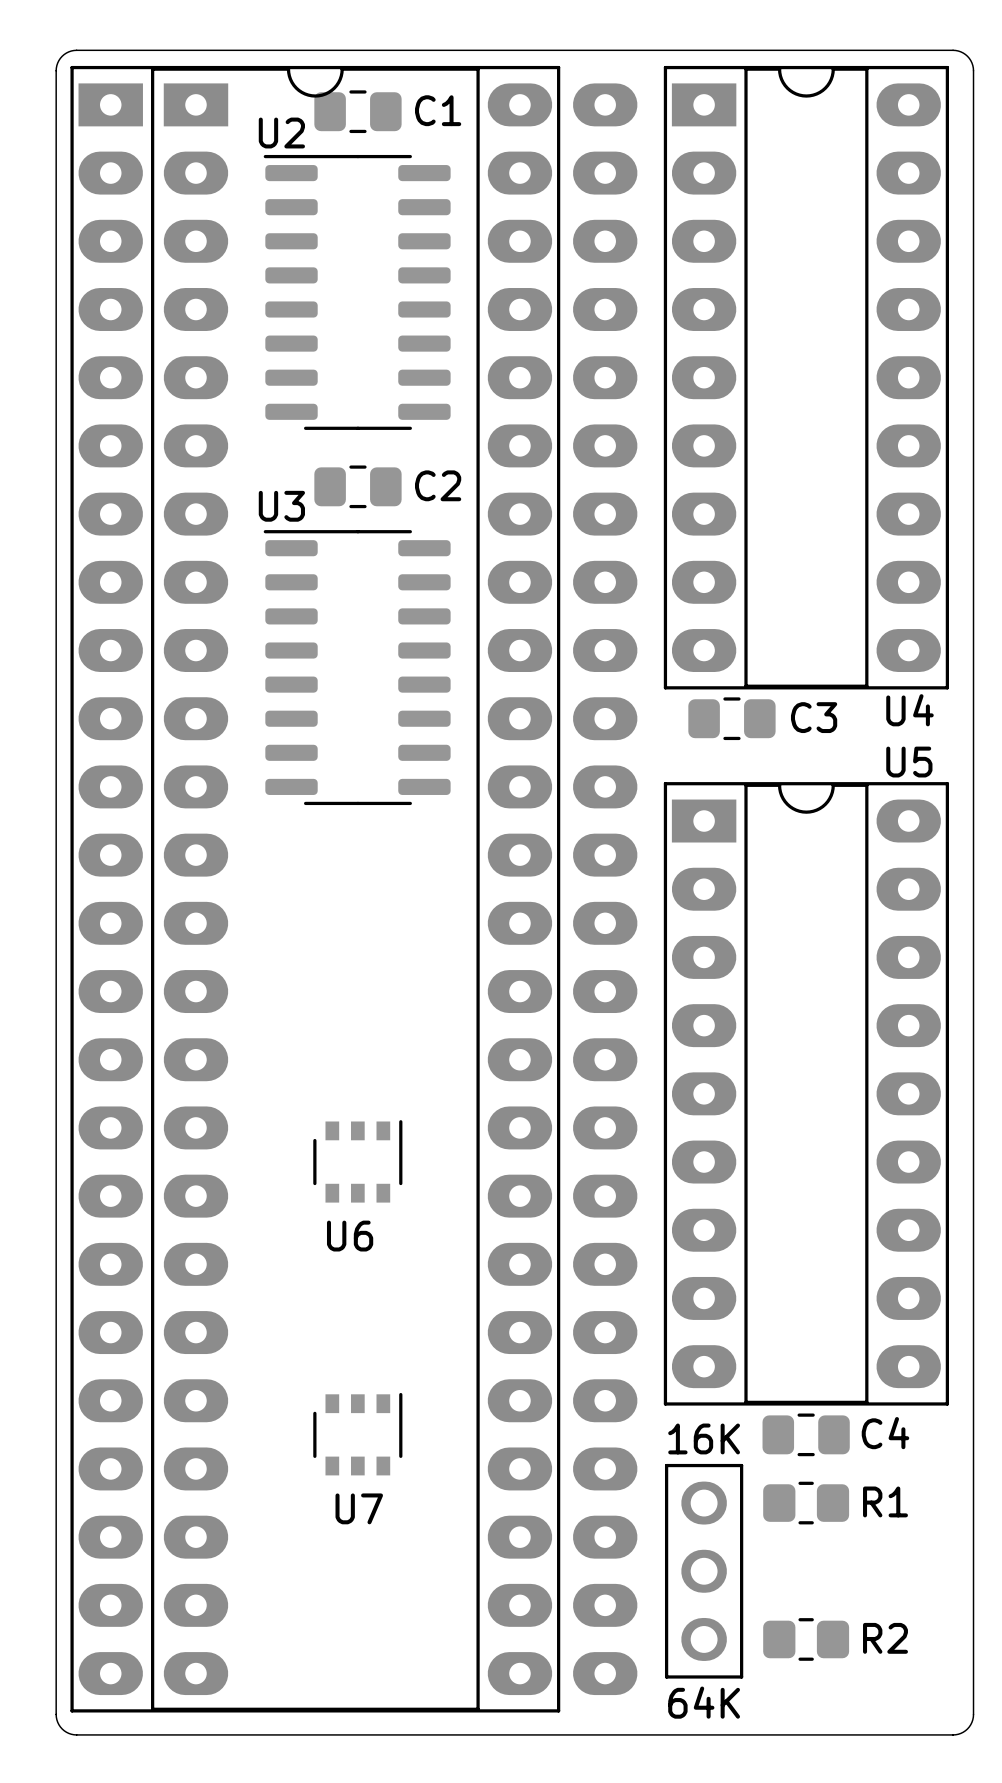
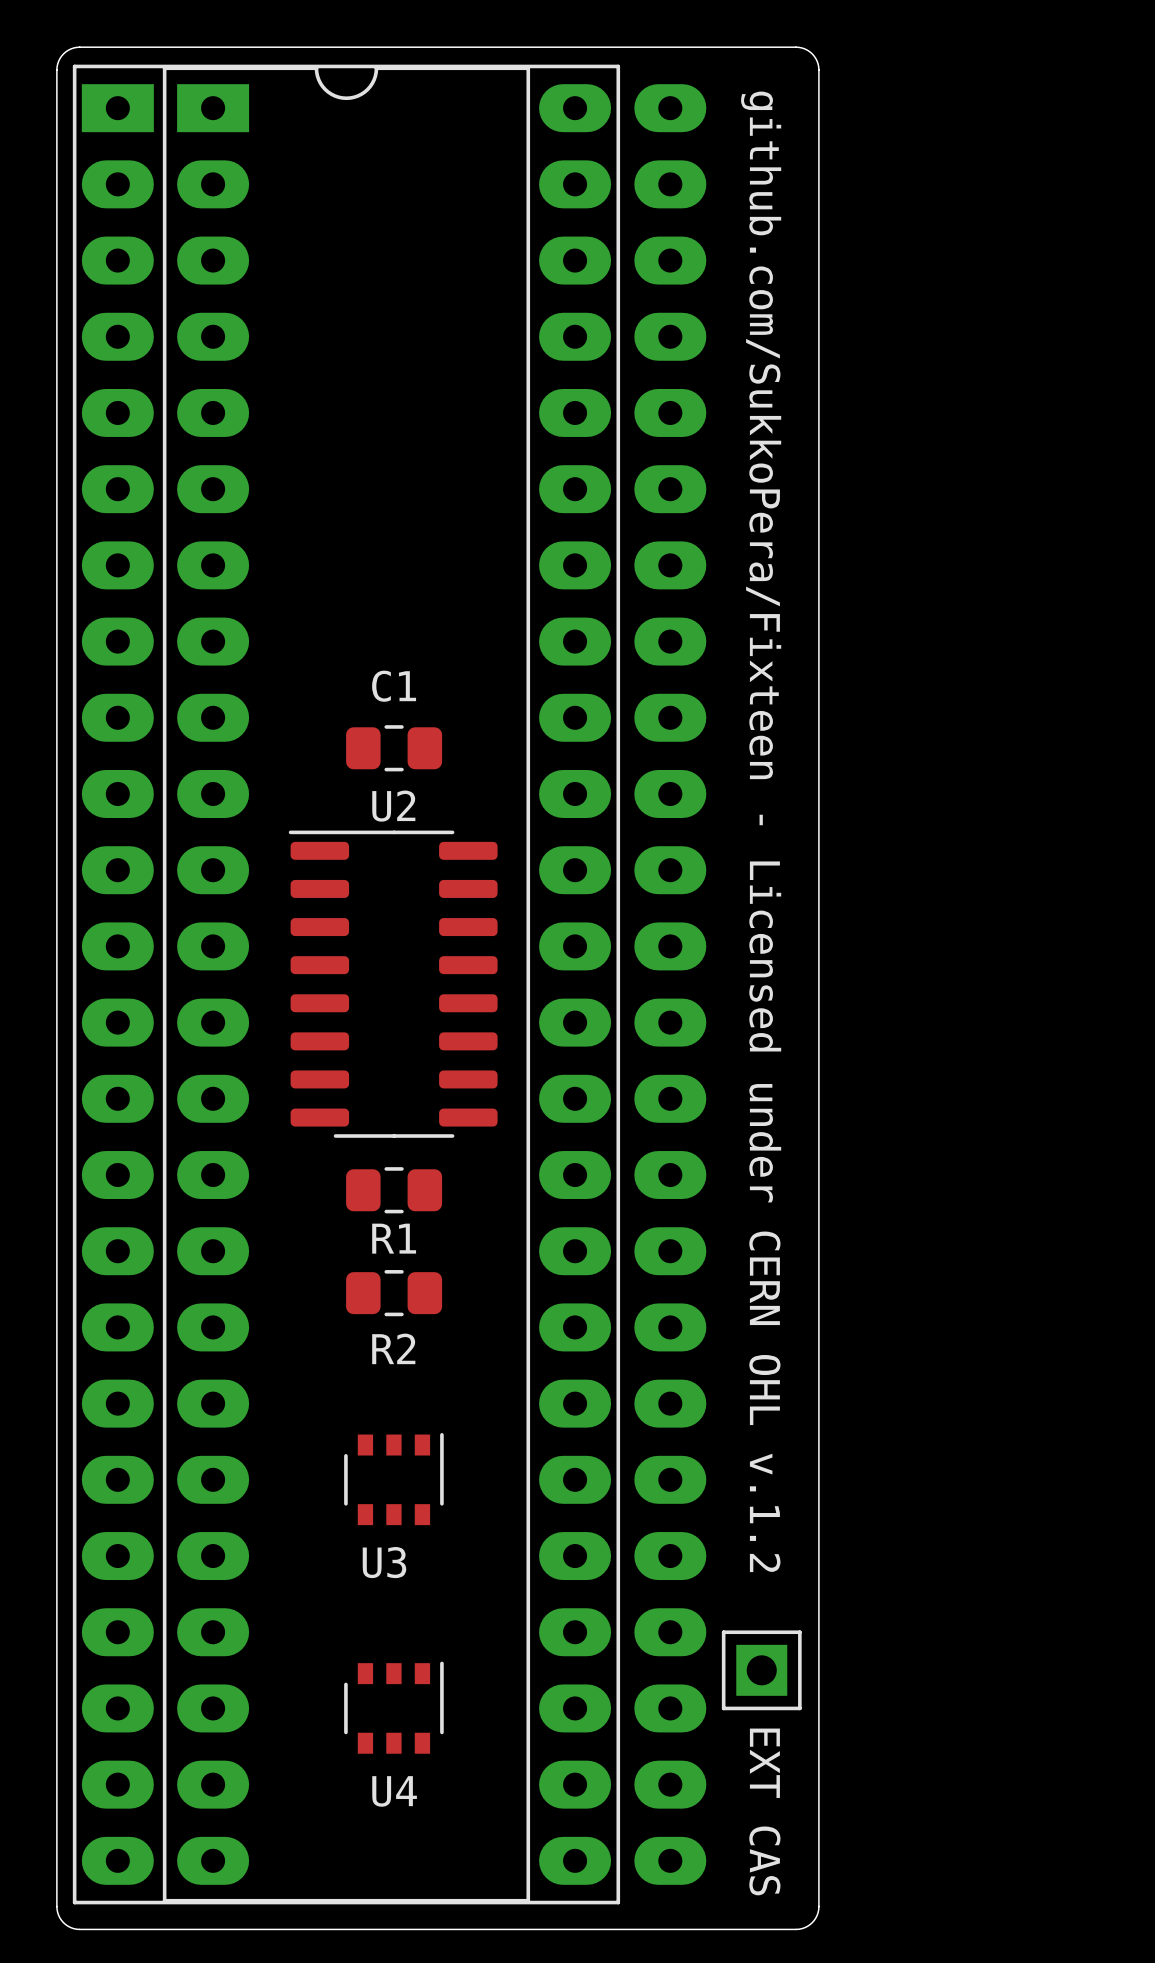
board edge: (717, 50) (955, 50) (967, 56) (971, 62) (973, 70) (973, 1717) (967, 1728) (955, 1734) (717, 1734) -> (796, 47) (804, 48) (812, 53) (817, 61) (818, 70) (818, 1906) (817, 1915) (812, 1922) (804, 1927) (796, 1929)
U4 footprint: [663, 65, 950, 690] -> [344, 1661, 444, 1754]
C1 footprint: [314, 90, 402, 134] -> [346, 725, 443, 772]
C1 name position: C1 (438, 110) -> C1 (394, 686)
U2 name position: U2 (281, 133) -> U2 (393, 806)
U2 position: (357, 292) -> (393, 984)
C2: (357, 486) -> none
U3 name position: U3 (281, 506) -> U3 (384, 1562)
U3 footprint: [263, 530, 451, 806] -> [344, 1433, 444, 1526]
U4 name position: U4 (910, 710) -> U4 (394, 1791)
C3: (731, 718) -> none
text: none -> github.com/SukkoPera/Fixteen - Licensed under CERN OHL v.1.2 (761, 831)
U5: (806, 1093) -> none
U6: (357, 1161) -> none
U7: (357, 1434) -> none
C4: (806, 1434) -> none
text: 16K (704, 1438) -> none
R1 footprint: [763, 1481, 850, 1525] -> [346, 1167, 443, 1214]
R1 name position: R1 (885, 1501) -> R1 (394, 1238)
part: none -> (761, 1670)
part: (704, 1571) -> none
R2 footprint: [763, 1618, 850, 1661] -> [346, 1270, 443, 1317]
text: none -> EXT CAS (764, 1811)
R2 name position: R2 (885, 1638) -> R2 (393, 1348)
text: 64K (704, 1702) -> none

